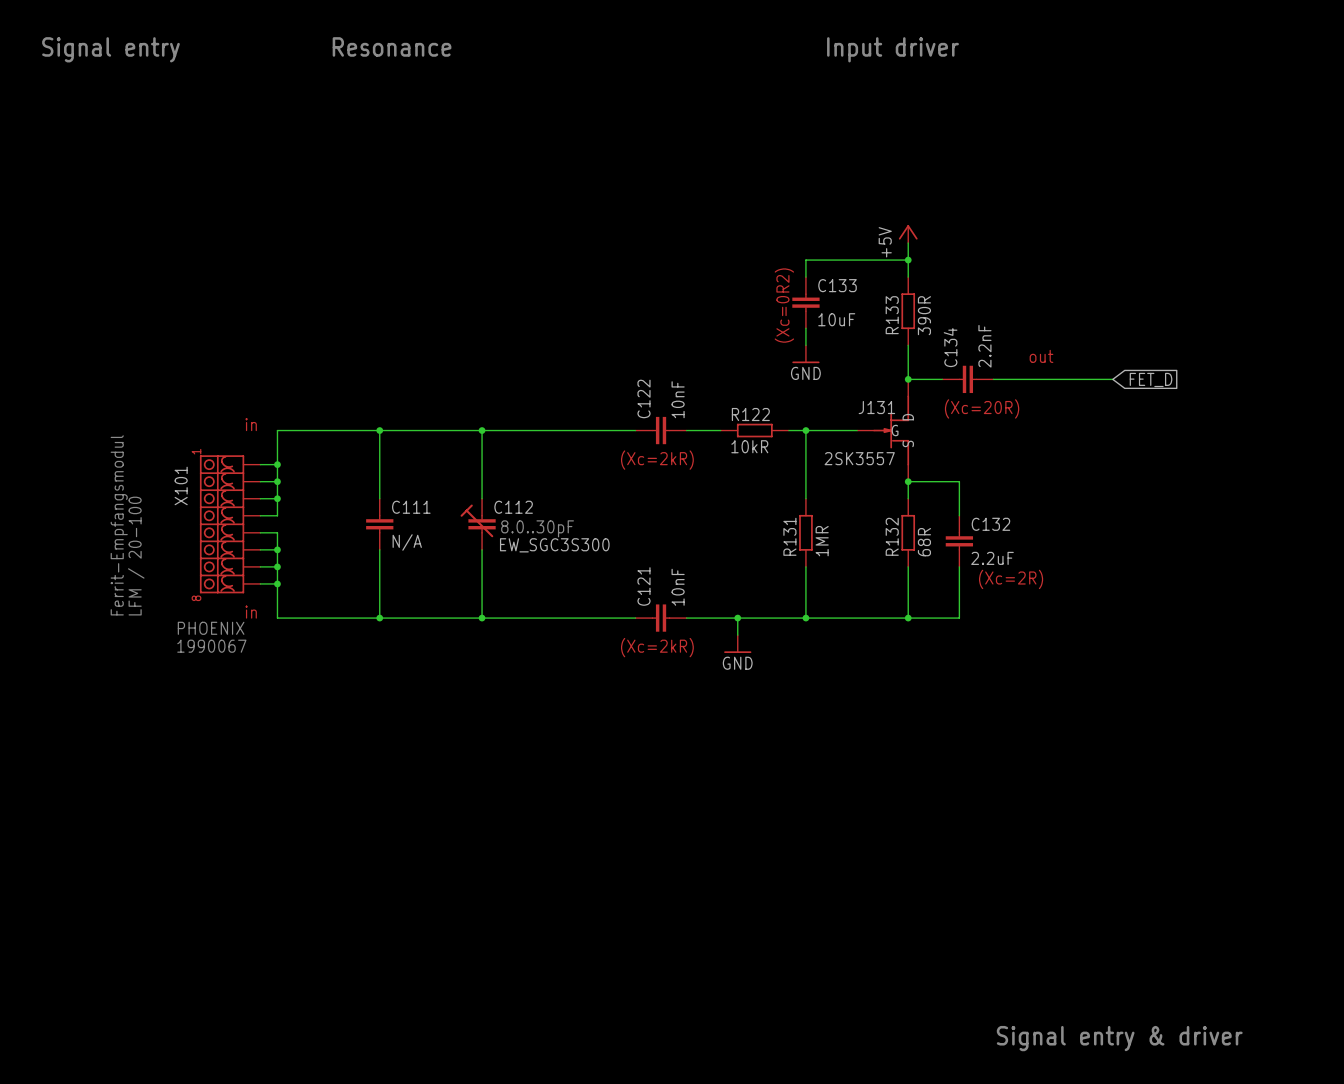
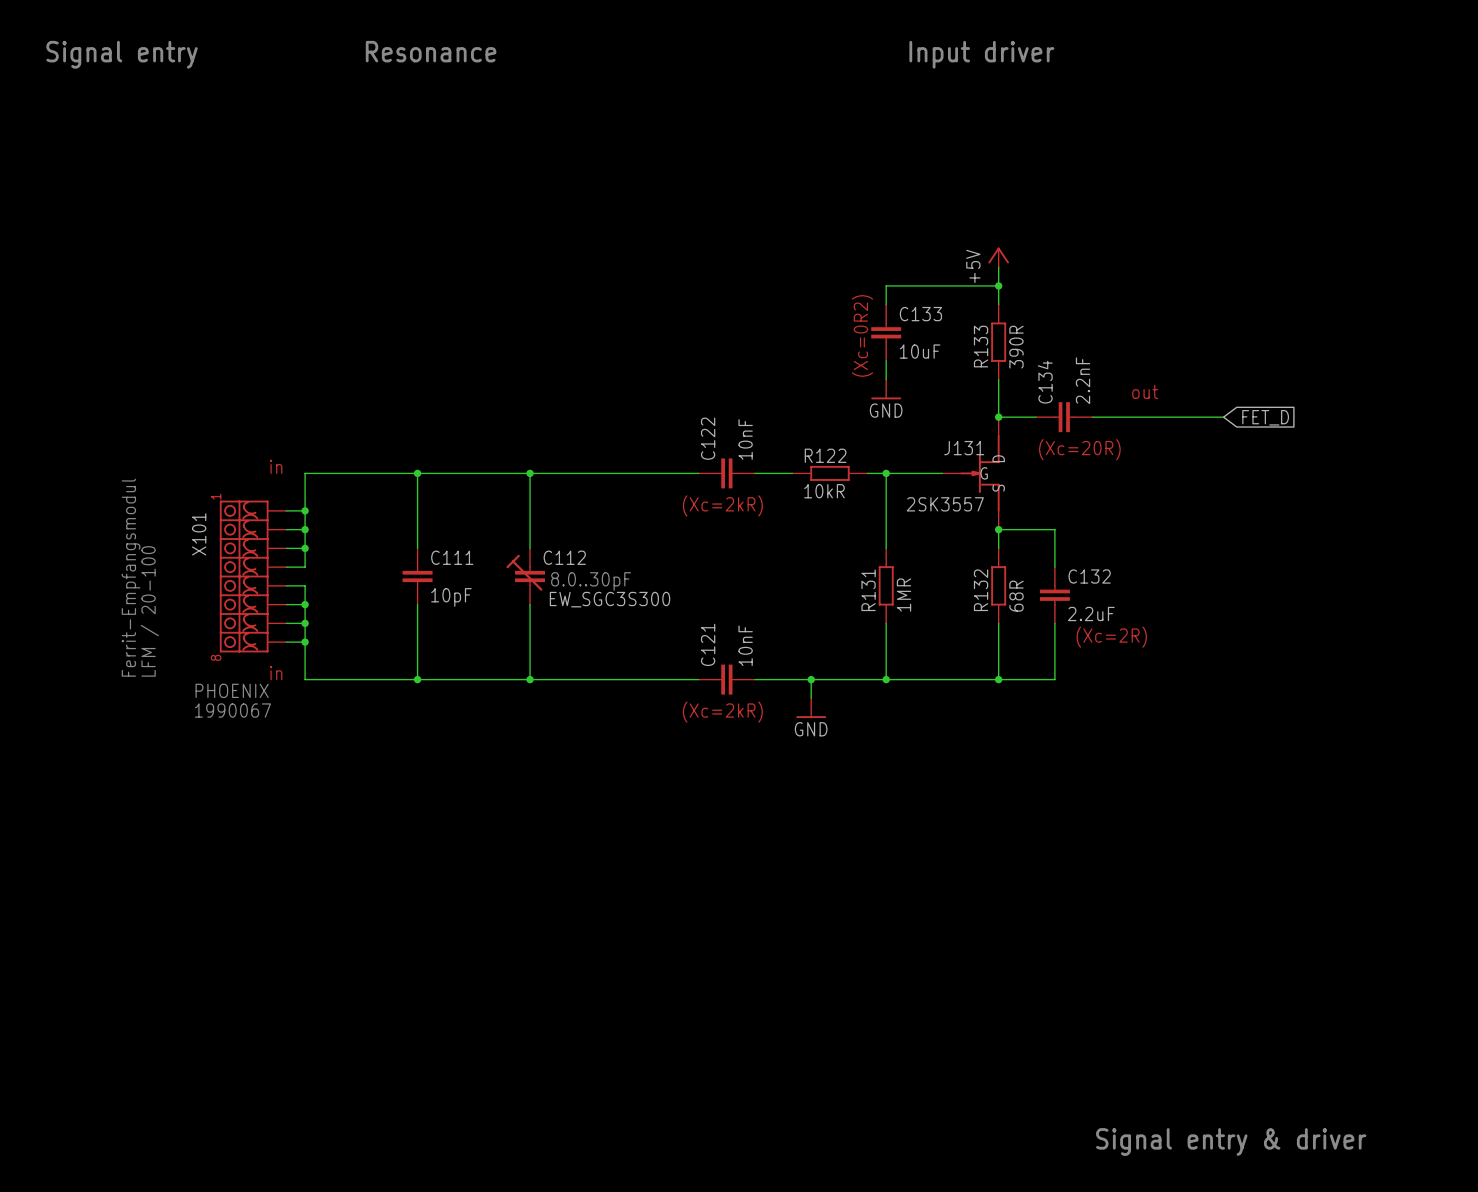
C111 value: N/A (407, 542) -> 10pF (451, 597)

